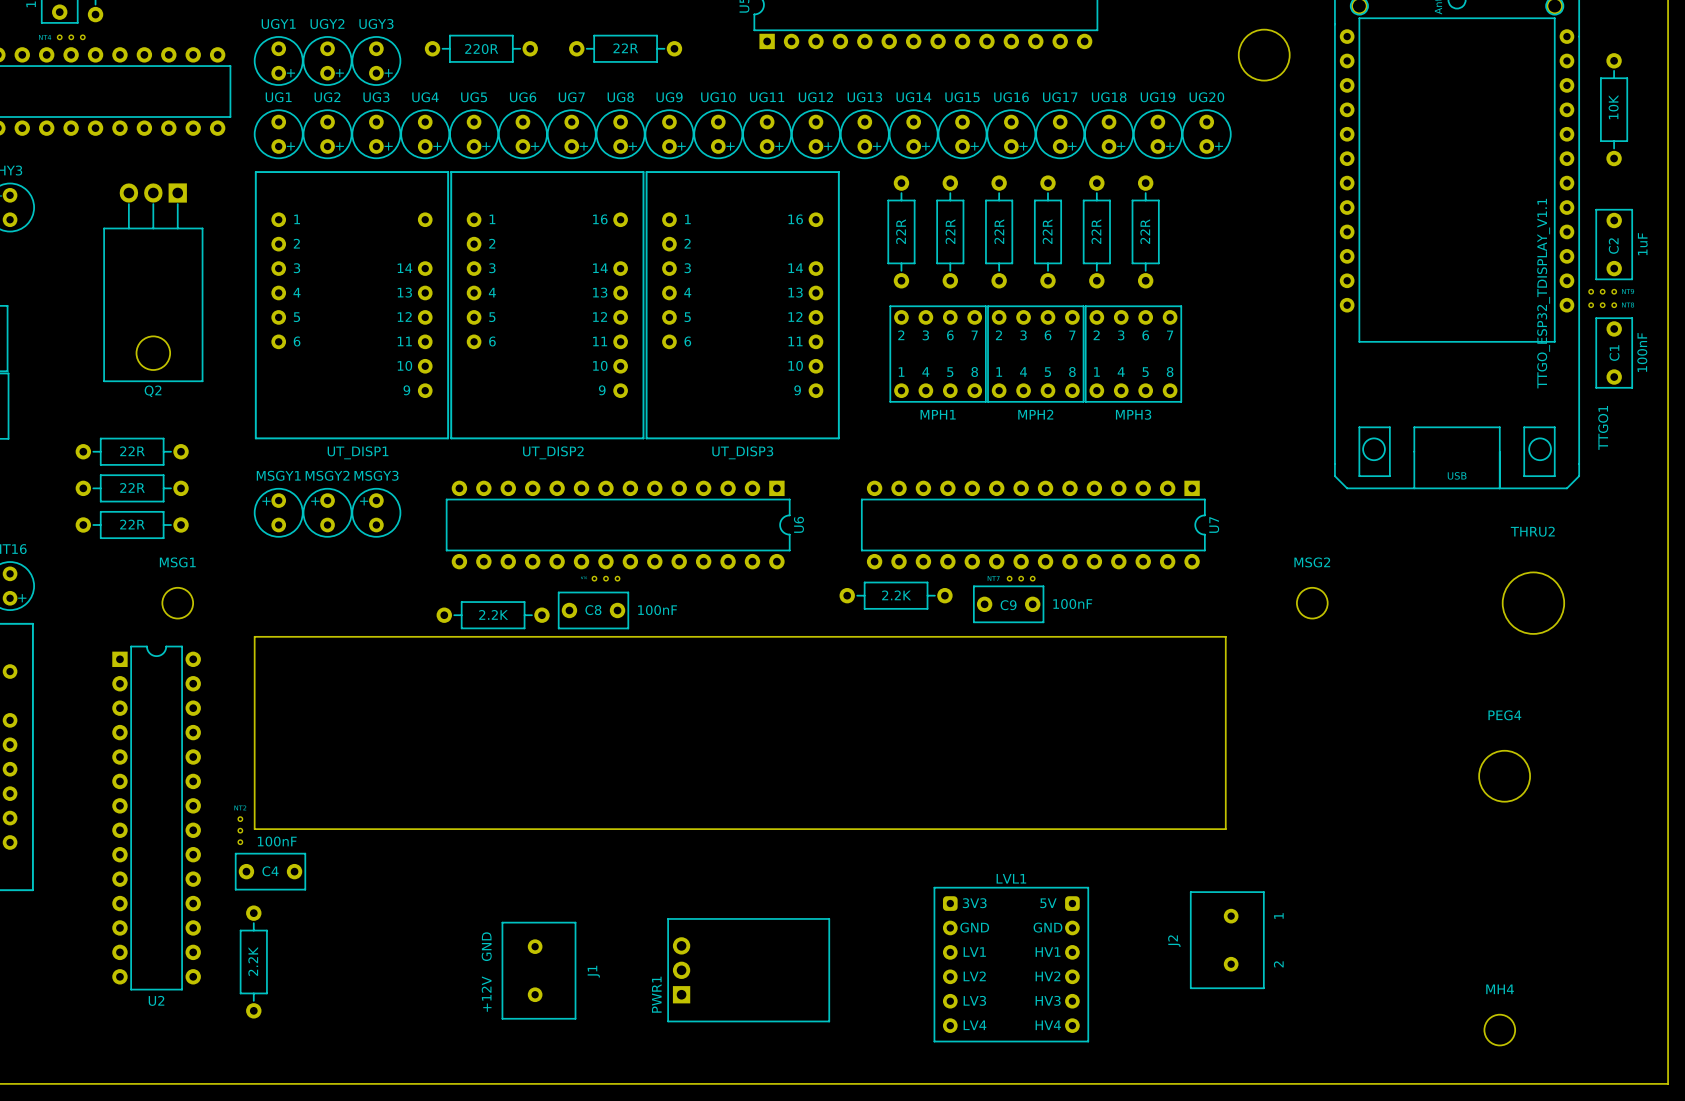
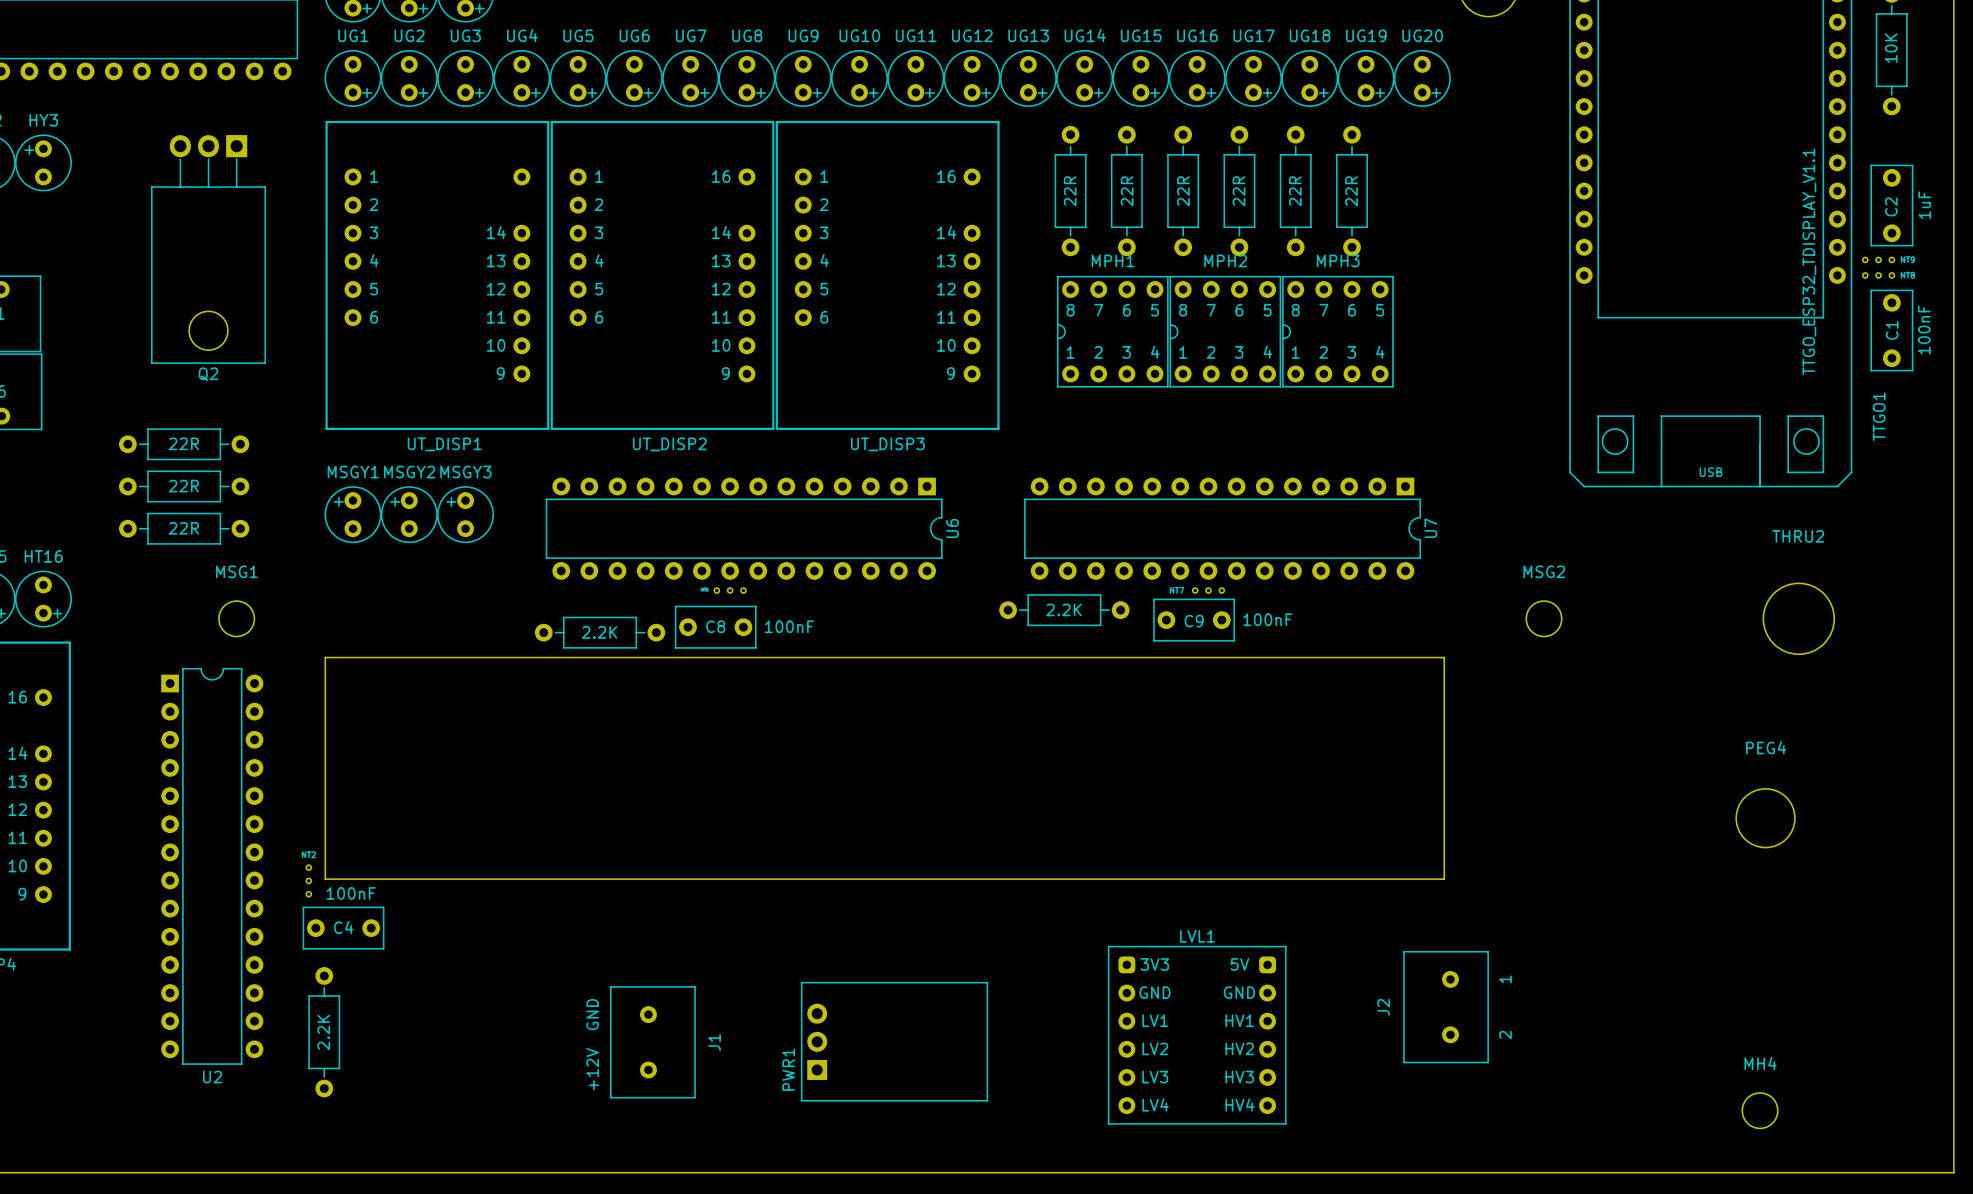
MPH1 footprint: [889, 305, 987, 403] -> [1057, 276, 1169, 388]
MPH2 footprint: [987, 305, 1085, 403] -> [1169, 276, 1282, 388]
MPH3 footprint: [1085, 305, 1182, 403] -> [1282, 276, 1394, 388]
MPH1 name position: MPH1 (938, 414) -> MPH1 (1113, 260)
MPH2 name position: MPH2 (1035, 414) -> MPH2 (1225, 260)
MPH3 name position: MPH3 (1133, 414) -> MPH3 (1338, 260)

